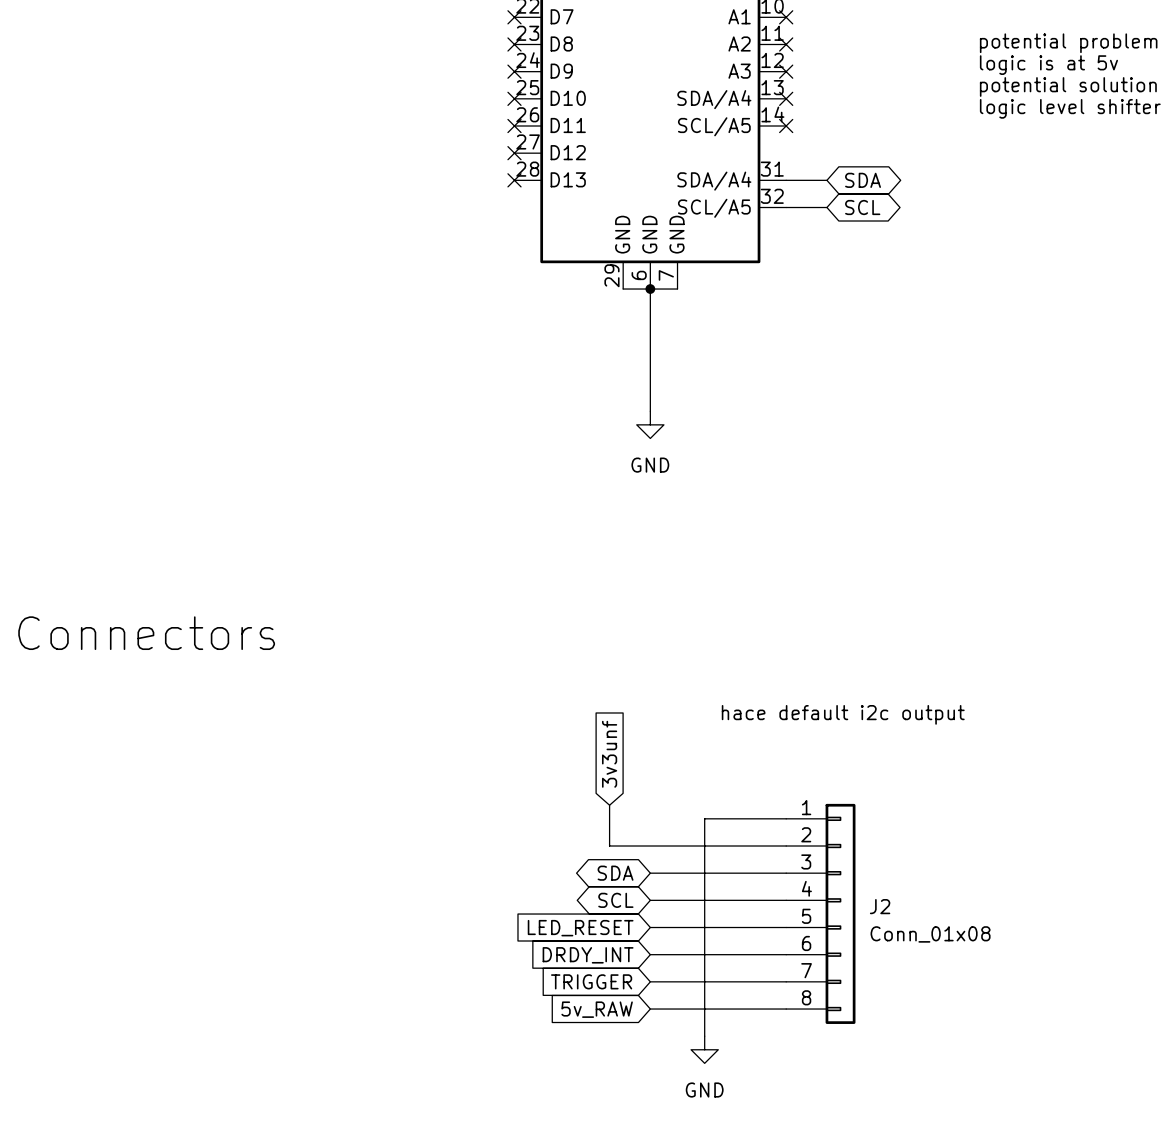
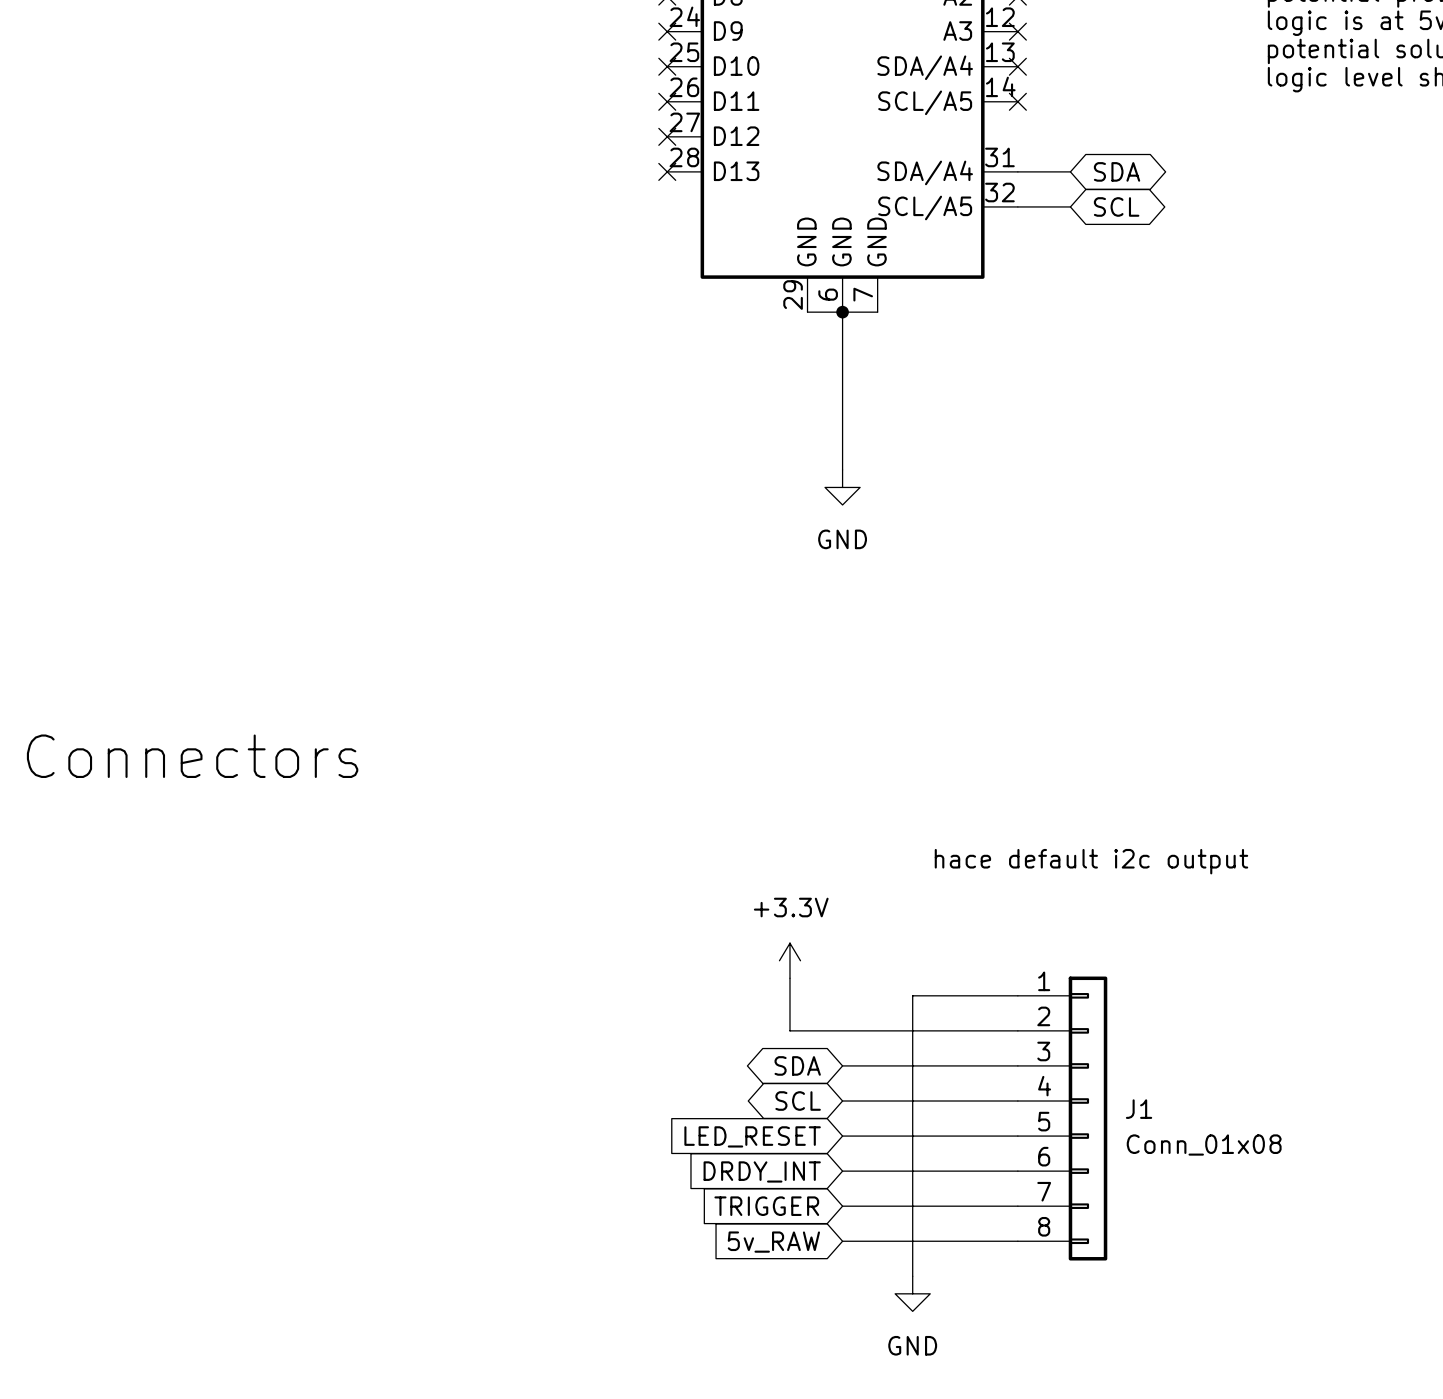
global label: 3v3unf (609, 754) -> none
power symbol: none -> +3.3V (789, 960)
J2 name: J2 (880, 906) -> J1 (1139, 1109)

